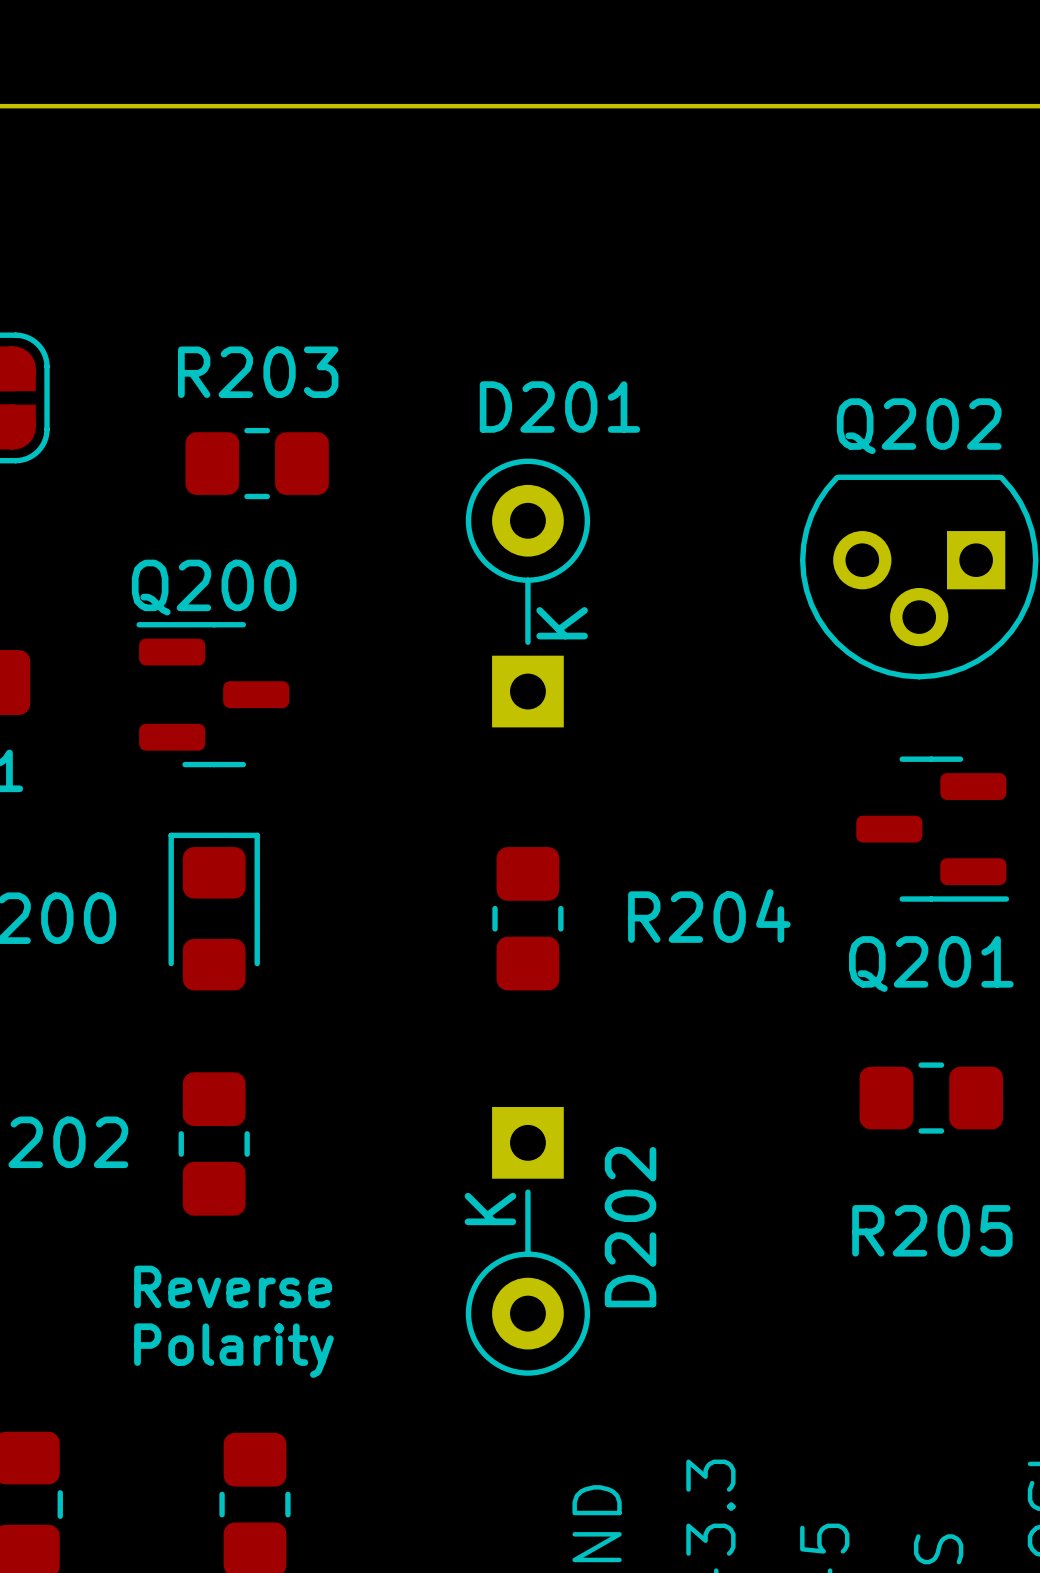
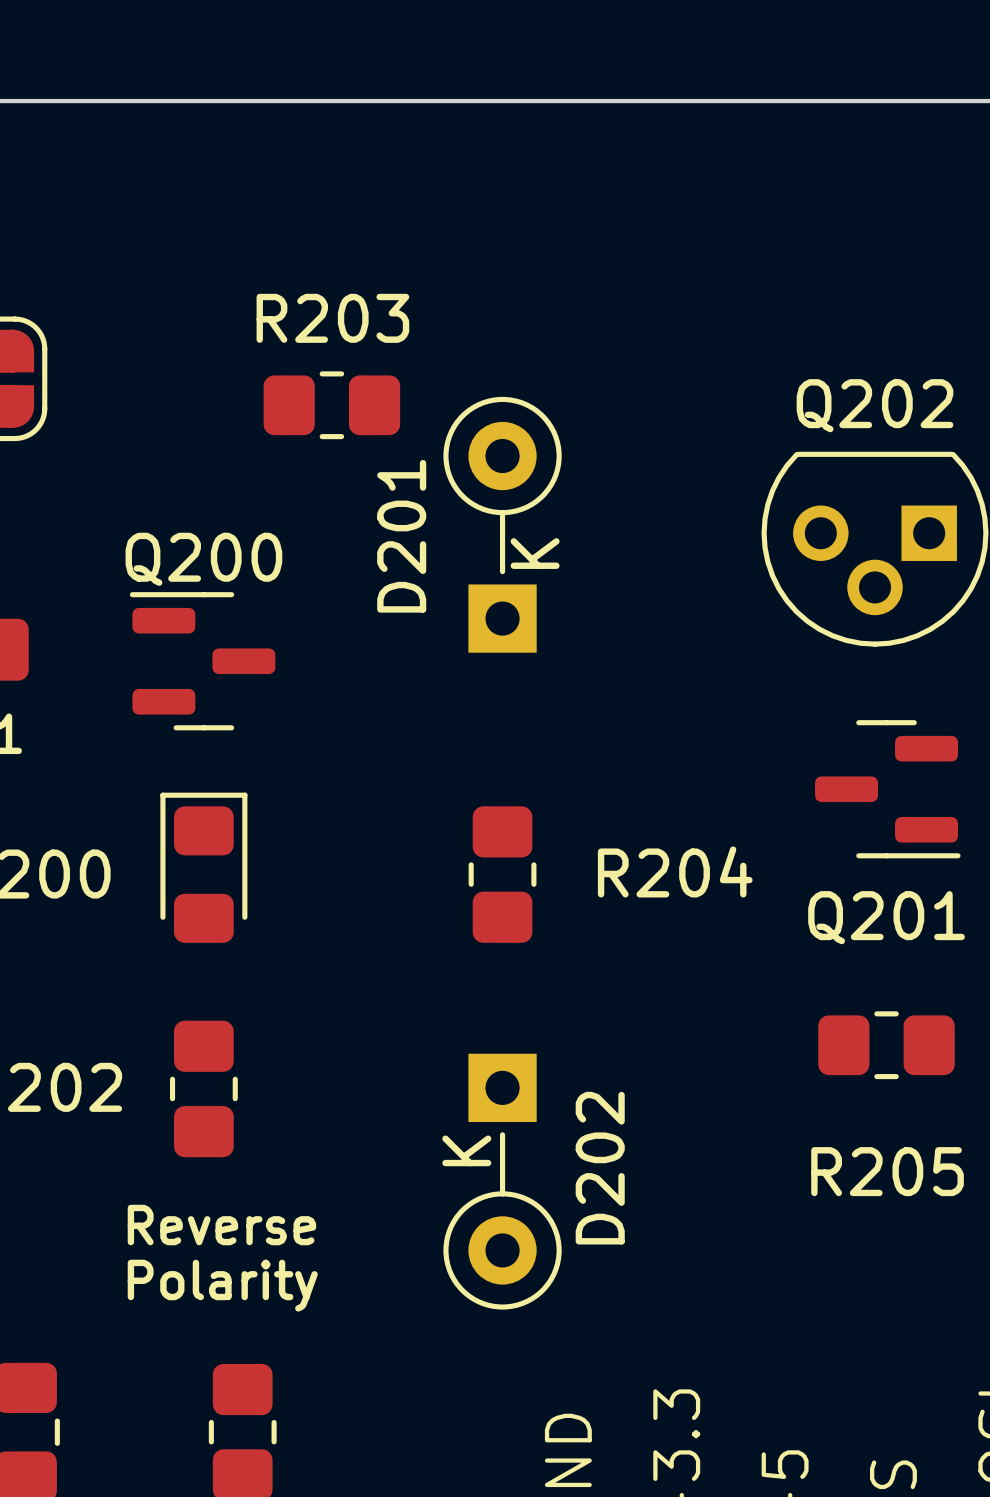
D201 name rotation: 0° (559, 407) -> 90° counterclockwise (401, 536)
D201 name position: D201 (559, 407) -> D201 (401, 536)
R203 position: (257, 463) -> (331, 405)
D201 position: (527, 593) -> (502, 524)

